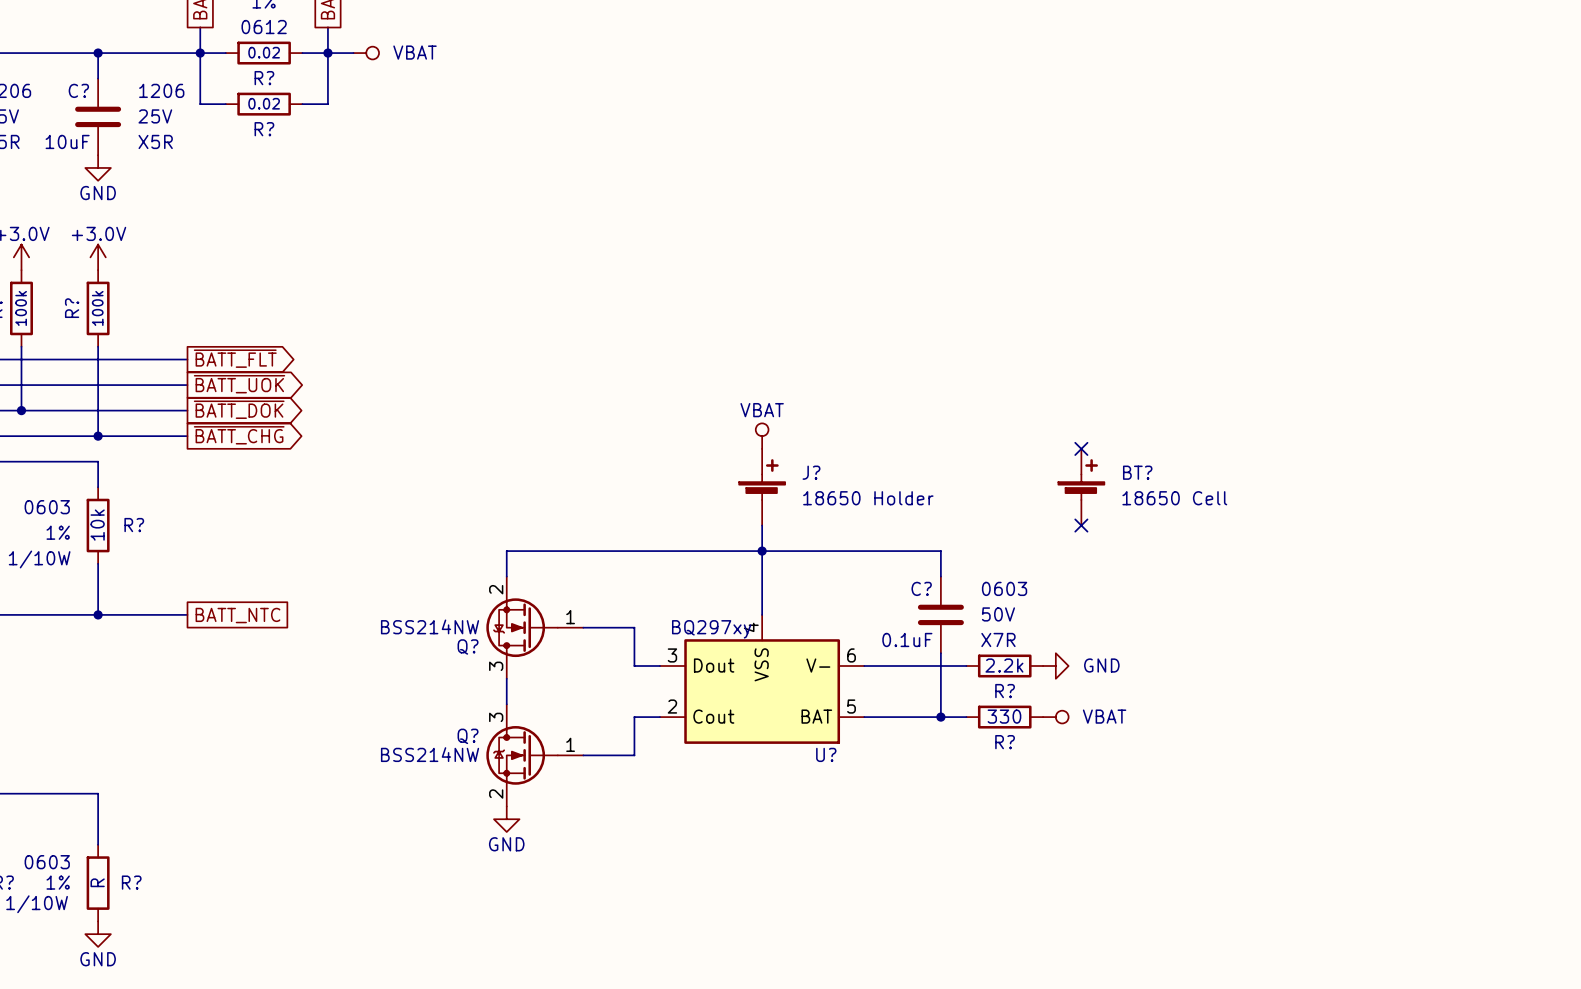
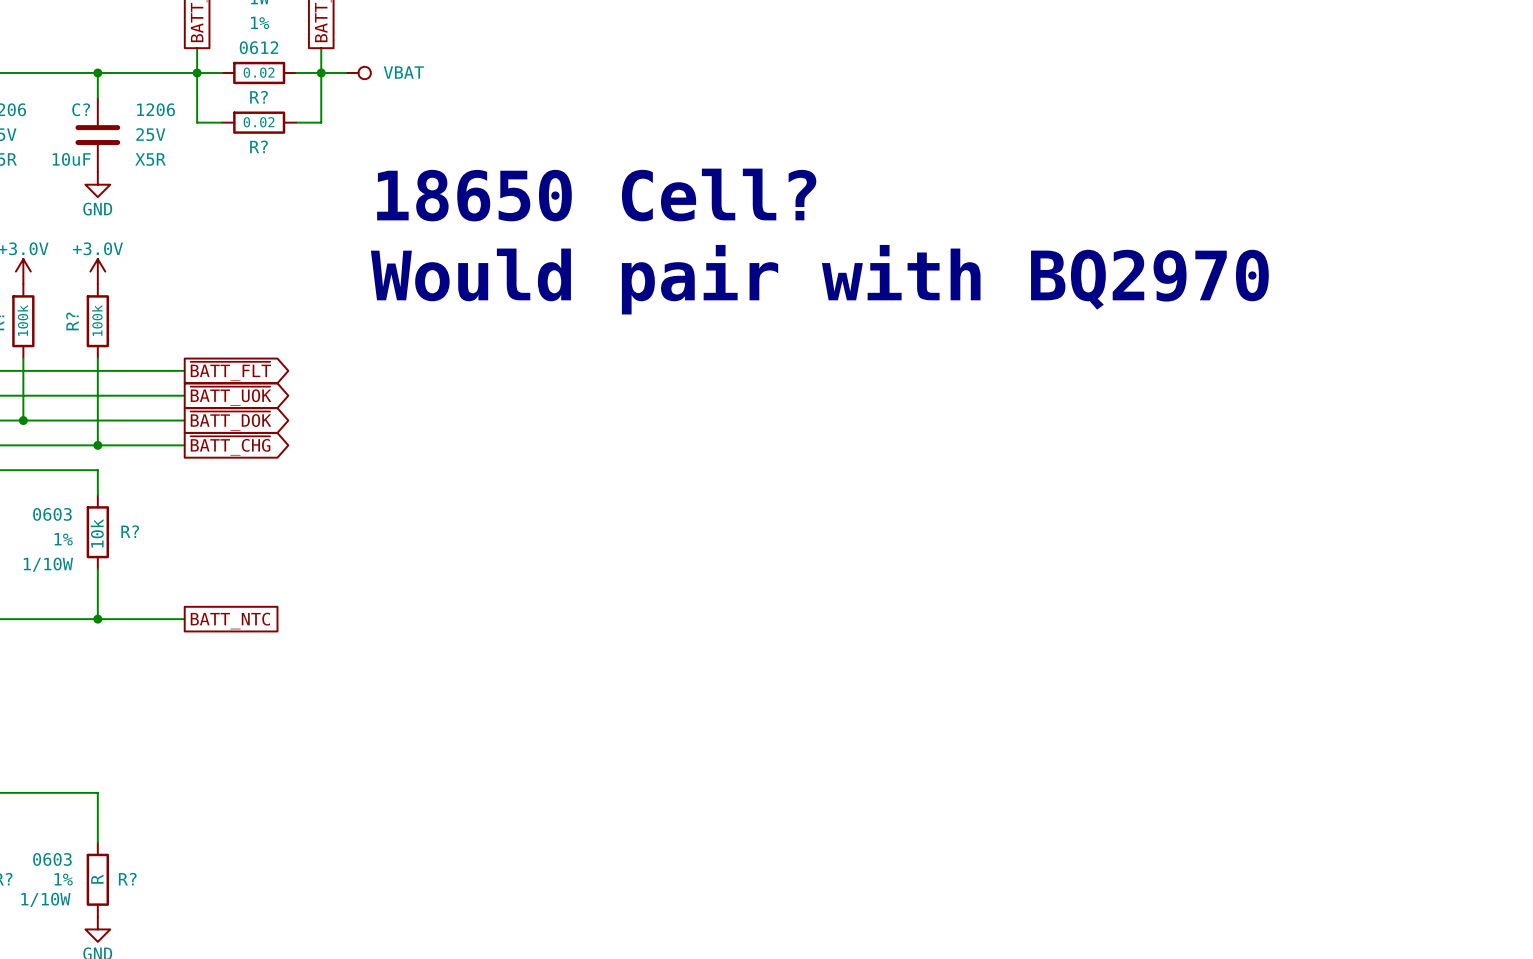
text: none -> 18650 Cell? (596, 195)
text: none -> Would pair with BQ2970 (819, 279)
power symbol: VBAT (762, 436) -> none
no-connect mark: (1081, 448) -> none
J?: 18650 Holder (762, 487) -> none
BT?: 18650 Cell (1081, 487) -> none
wire: (762, 525) (762, 614) -> none
no-connect mark: (1081, 525) -> none
junction: (762, 551) -> none
wire: (506, 576) (506, 551) (940, 551) (940, 576) -> none
C?: 0.1uF (940, 614) -> none
Q?: BSS214NW (534, 627) -> none
wire: (583, 627) (634, 627) (634, 666) (659, 666) -> none
wire: (940, 653) (940, 717) -> none
wire: (864, 666) (966, 666) -> none
R?: 2.2k (1004, 666) -> none
power symbol: GND (1055, 666) -> none
wire: (506, 678) (506, 704) -> none
U?: BQ297xy (762, 679) -> none
wire: (659, 717) (634, 717) (634, 755) (583, 755) -> none
wire: (864, 717) (966, 717) -> none
junction: (940, 717) -> none
R?: 330 (1004, 717) -> none
power symbol: VBAT (1055, 717) -> none
Q?: BSS214NW (534, 755) -> none
power symbol: GND (506, 819) -> none

